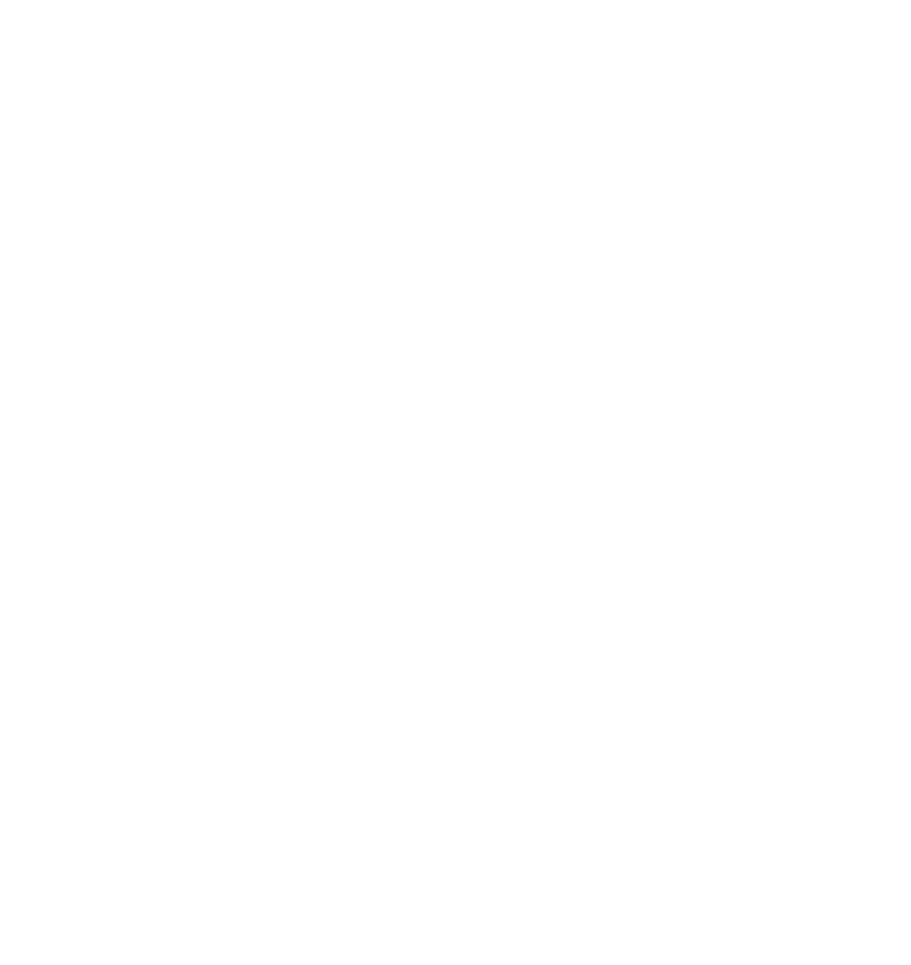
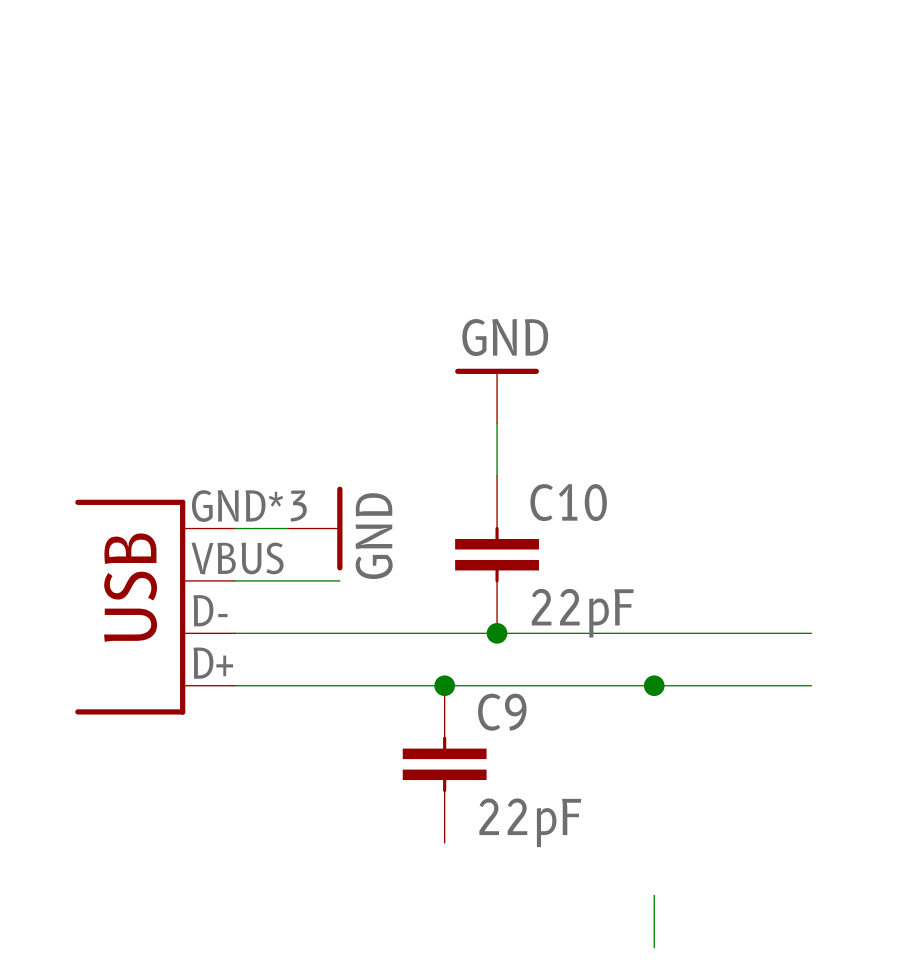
power symbol: none -> GND (497, 396)
wire: none -> (497, 423) (497, 476)
wire: none -> (235, 528) (287, 528)
power symbol: none -> GND (314, 528)
C10: none -> 22pF (497, 554)
wire: none -> (235, 580) (339, 580)
part: none -> (155, 607)
wire: none -> (235, 633) (811, 633)
junction: none -> (497, 633)
wire: none -> (235, 685) (811, 685)
junction: none -> (444, 685)
junction: none -> (654, 685)
C9: none -> 22pF (444, 764)
wire: none -> (654, 895) (654, 947)

